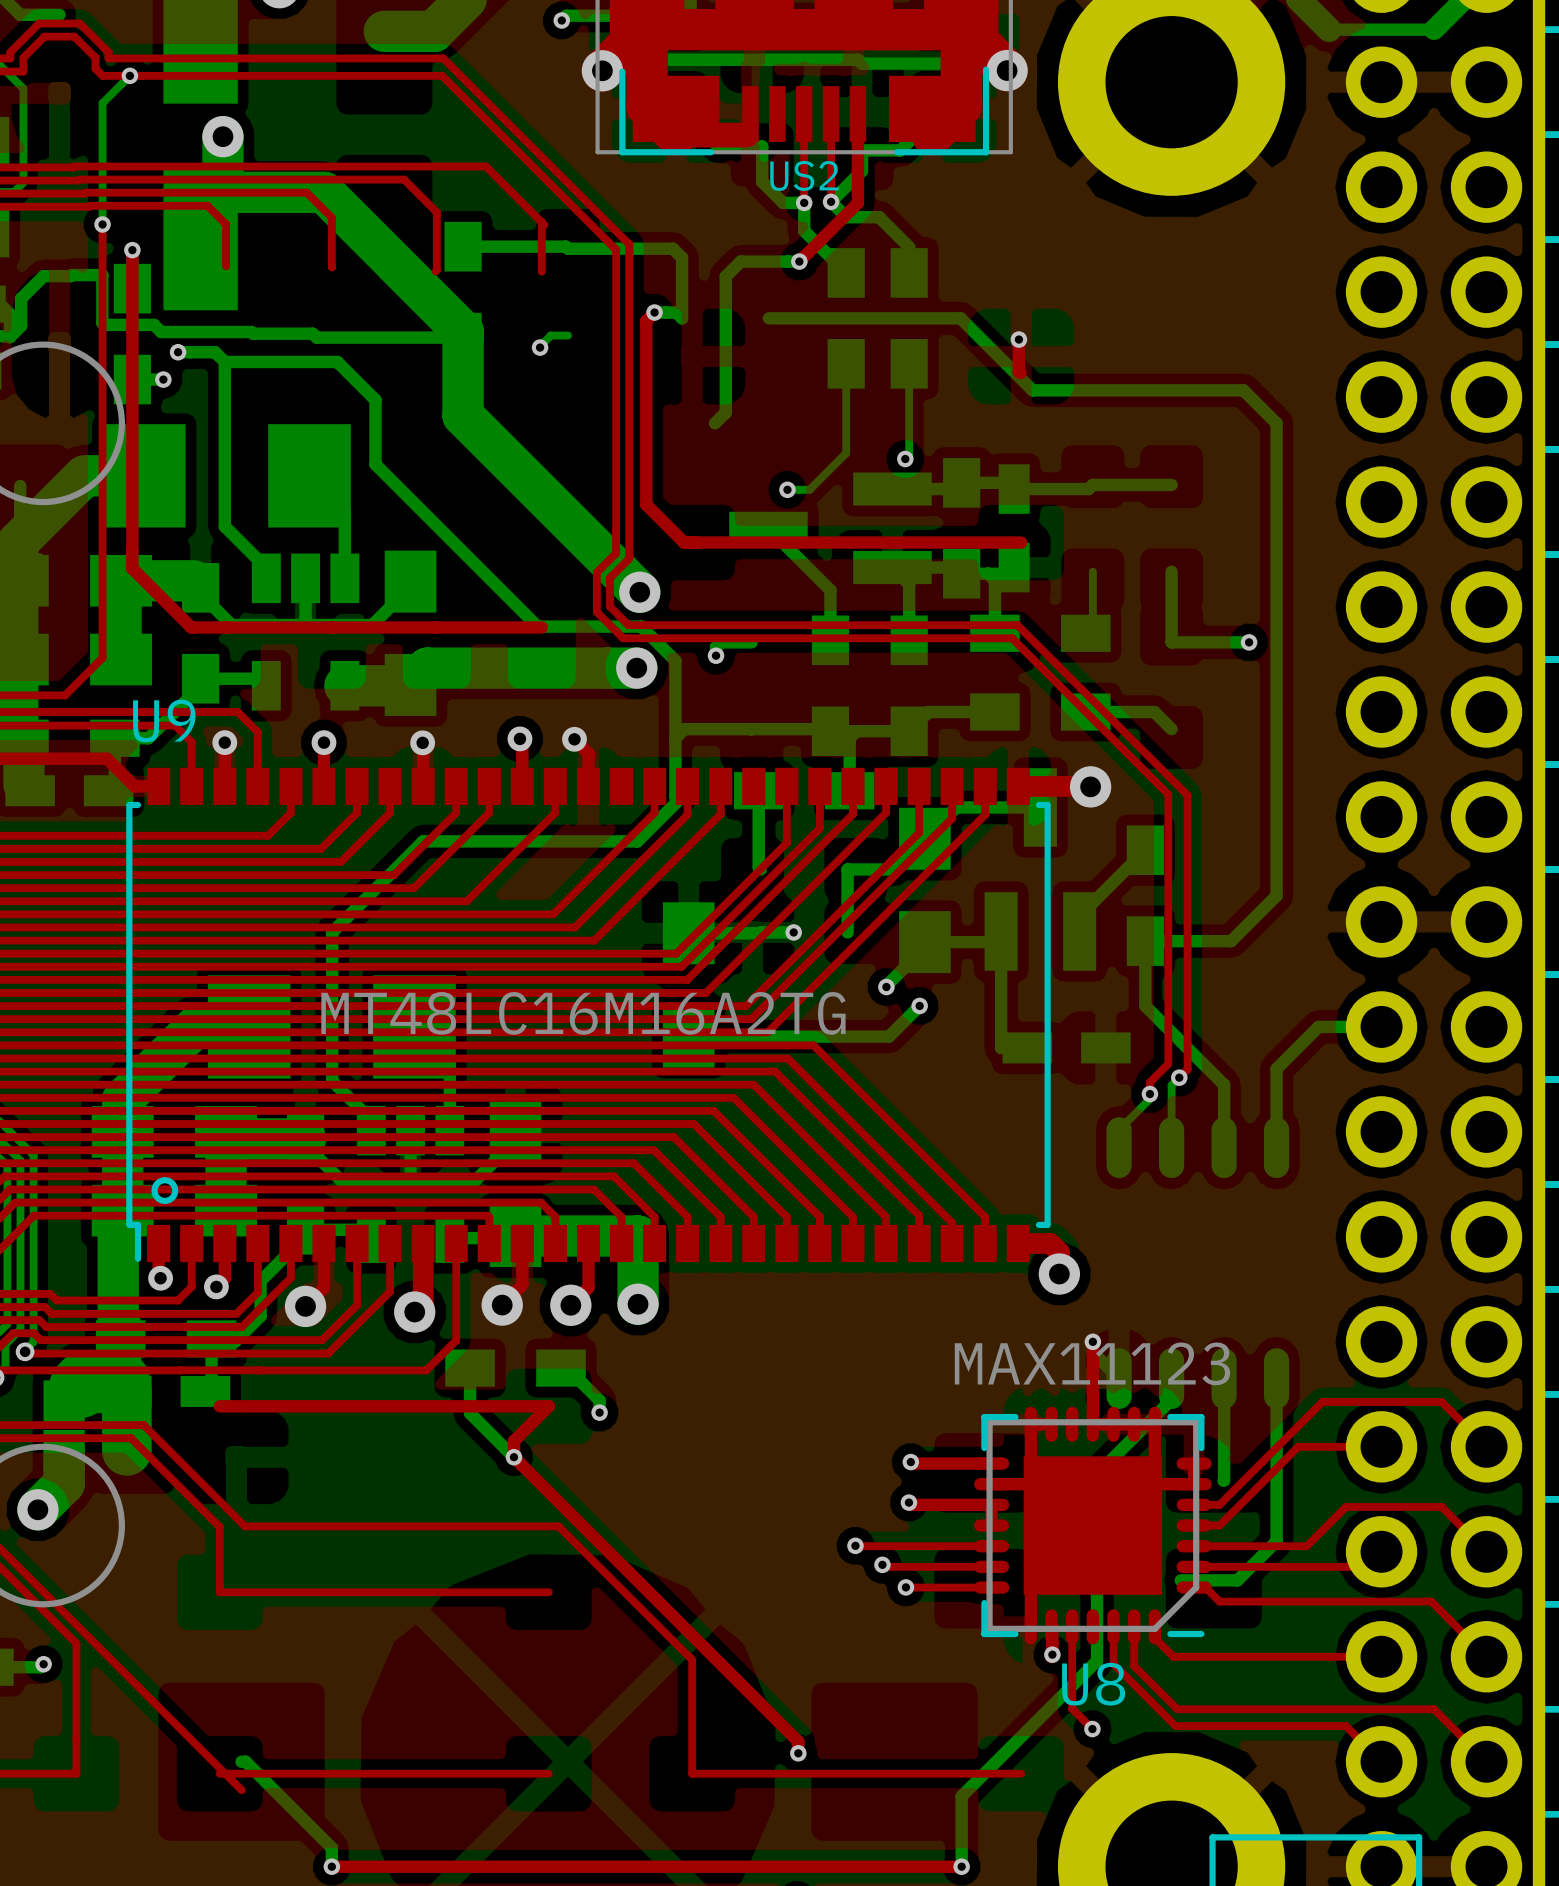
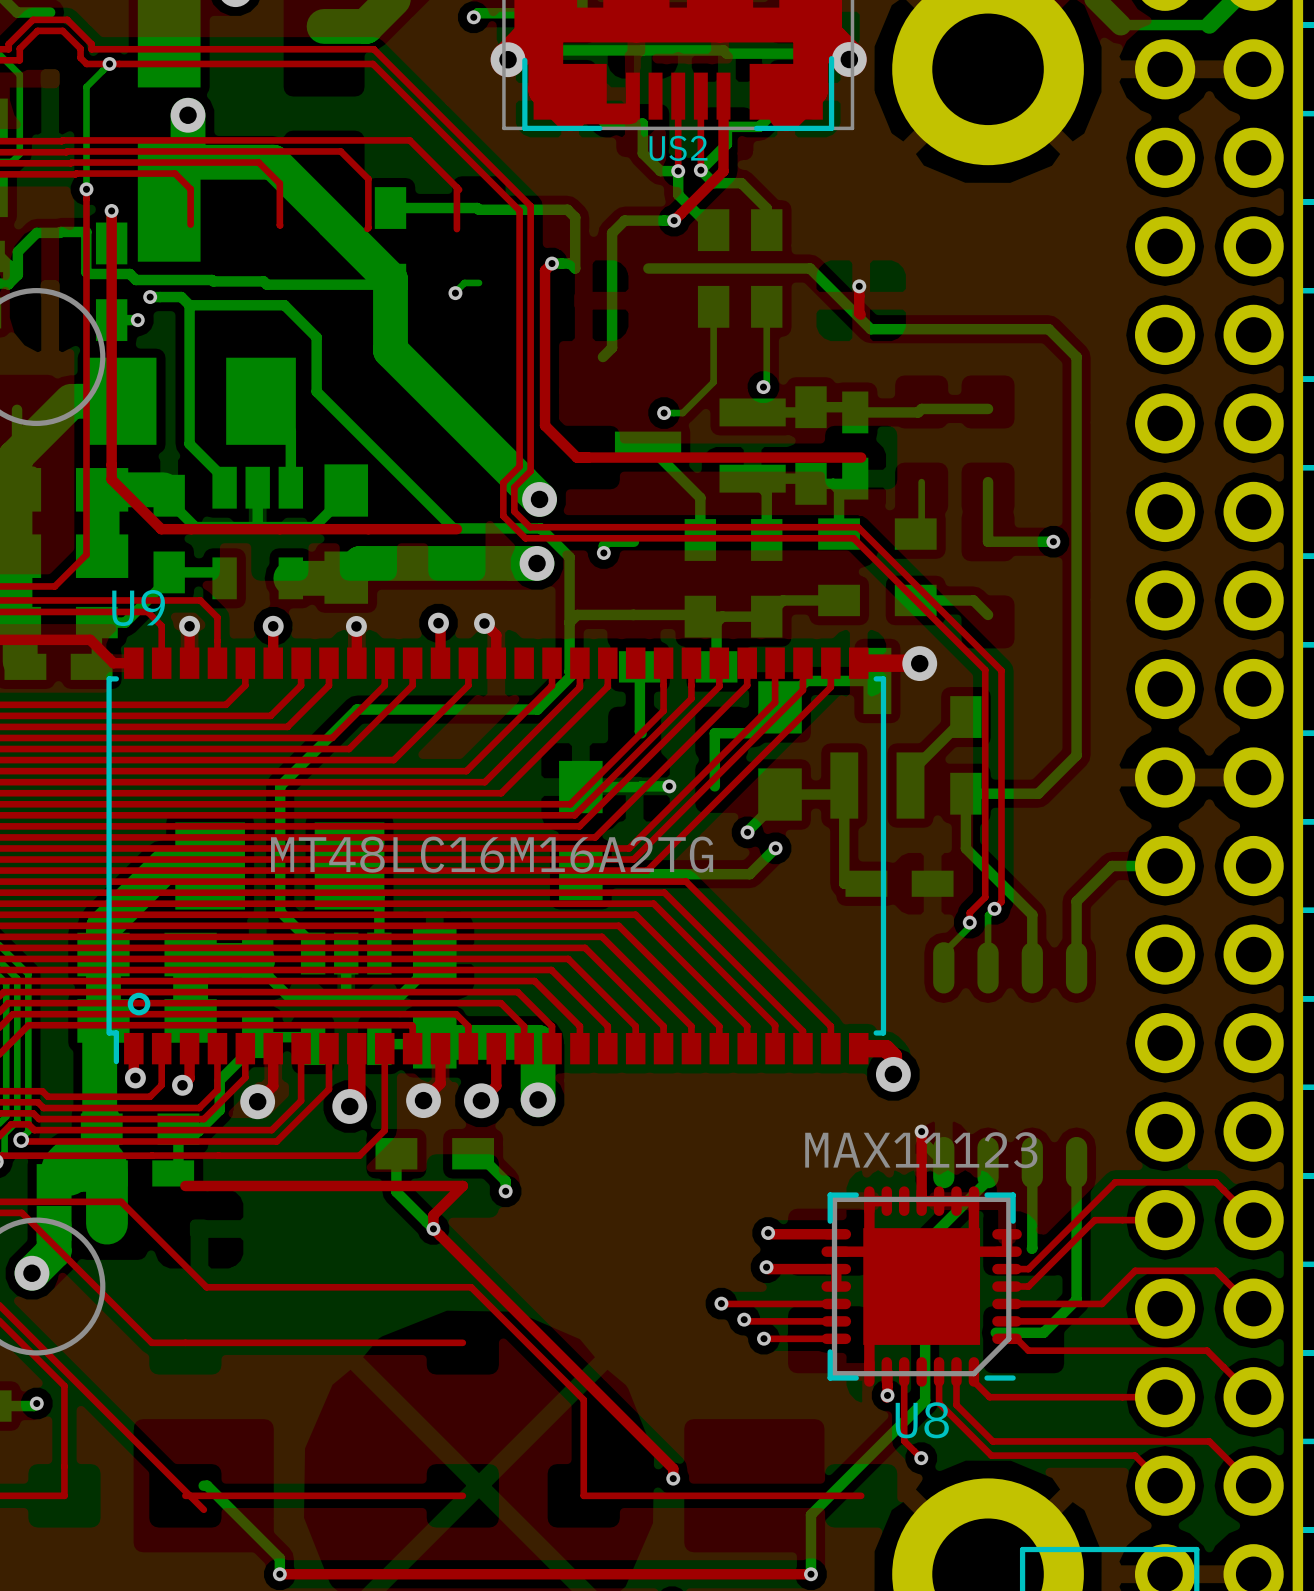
top track: (25, 1438) (130, 1438) (219, 1527) (219, 1592) -> (21, 1212) (151, 1342) (185, 1342)

